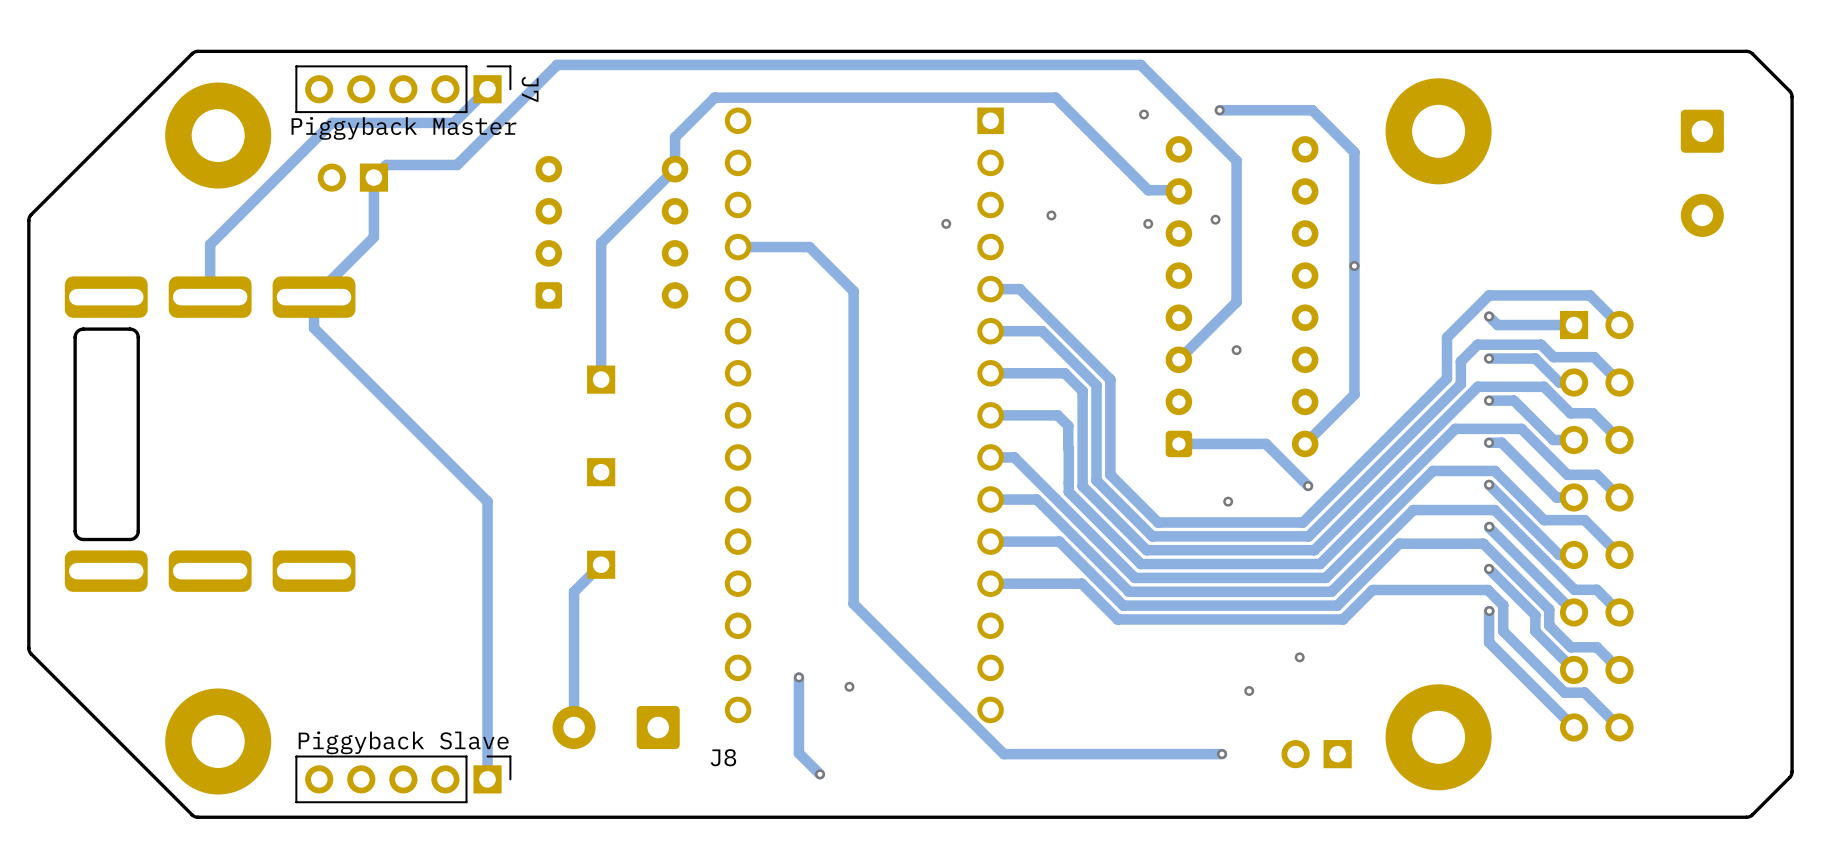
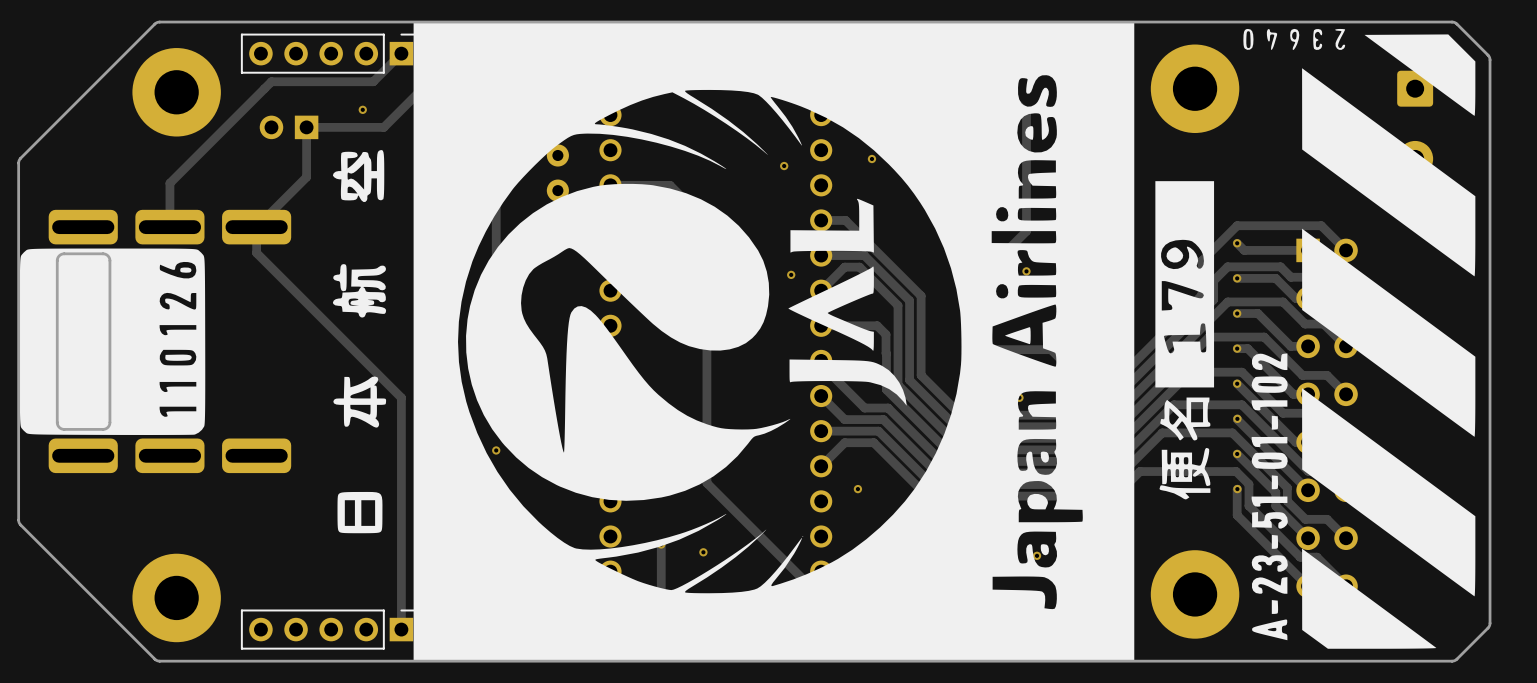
drawing: none -> [19, 21, 1476, 662]
track: (557, 64) (457, 164) (386, 164) (373, 177) -> (459, 33) (453, 33) (436, 50) (436, 74) (383, 127) (306, 127)
J7 name: J7 (530, 89) -> none
J7 value: Piggyback Master (403, 128) -> none
via: none -> (362, 109)
via: none -> (791, 274)
track: (1064, 373) (990, 373) -> (883, 290) (859, 267) (844, 267) (821, 290)
part: (601, 379) -> none
track: (990, 457) (1014, 457) (1070, 513) -> (821, 360) (821, 364) (864, 408) (888, 408)
part: (601, 472) -> none
track: (990, 499) (1036, 499) (1065, 527) -> (821, 396) (844, 419) (883, 419)
track: (601, 564) (574, 591) (574, 727) -> none
part: (601, 564) -> none
via: none -> (496, 450)
track: (1081, 583) (990, 583) -> (897, 466) (873, 442) (844, 442) (821, 466)
via: none -> (857, 489)
J8 value: Piggyback Slave (403, 742) -> none
J8 name: J8 (723, 757) -> none

